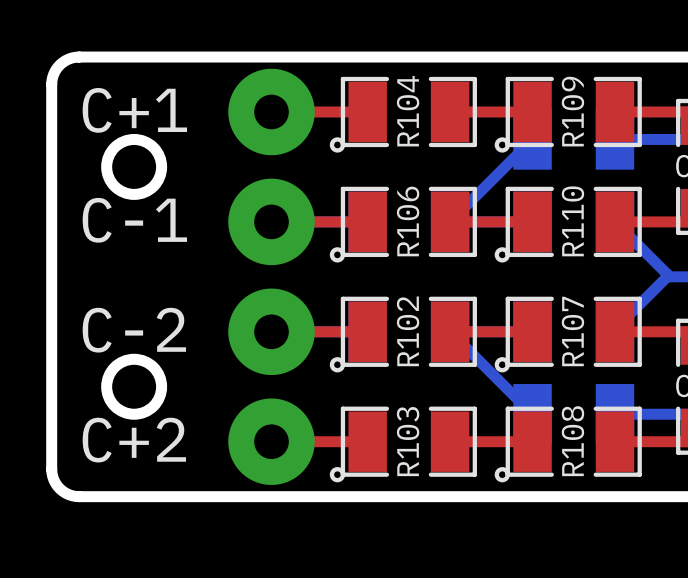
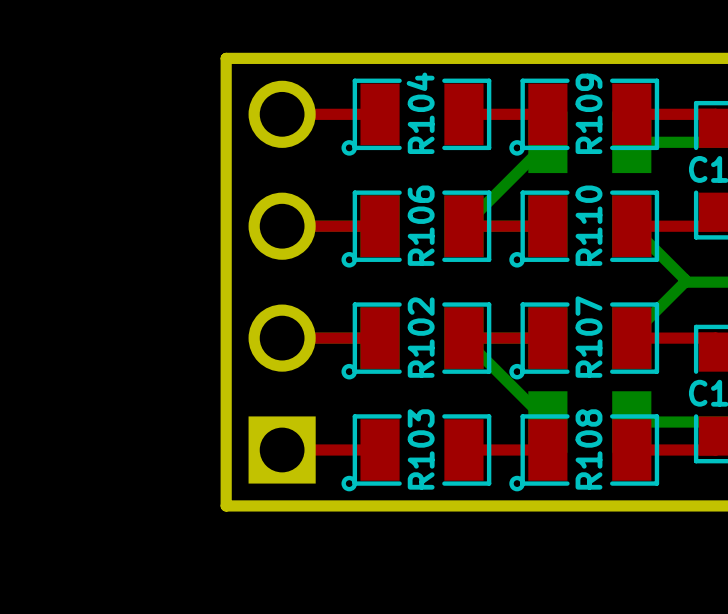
board edge: (216, 57) (75, 57) (65, 60) (57, 67) (51, 84) (51, 469) (53, 479) (62, 490) (75, 496) (216, 496) -> (226, 58) (226, 505)
text: C+1 (134, 110) -> none
part: (271, 111) -> none
round board edge: [101, 133, 168, 200] -> none
text: C-1 (134, 220) -> none
part: (271, 221) -> none
part: none -> (282, 282)
text: C-2 (134, 330) -> none
part: (271, 331) -> none
round board edge: [101, 353, 168, 420] -> none
text: C+2 (134, 440) -> none
part: (271, 441) -> none

